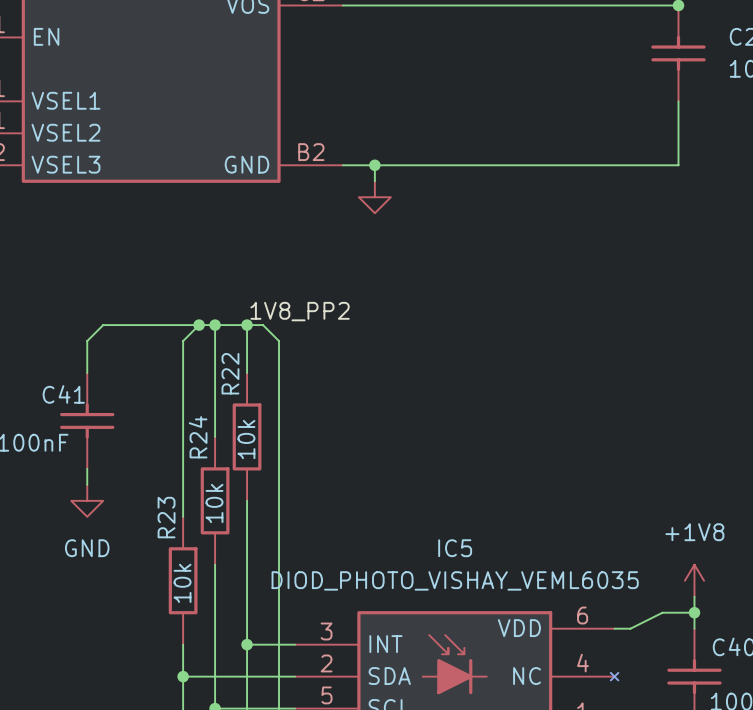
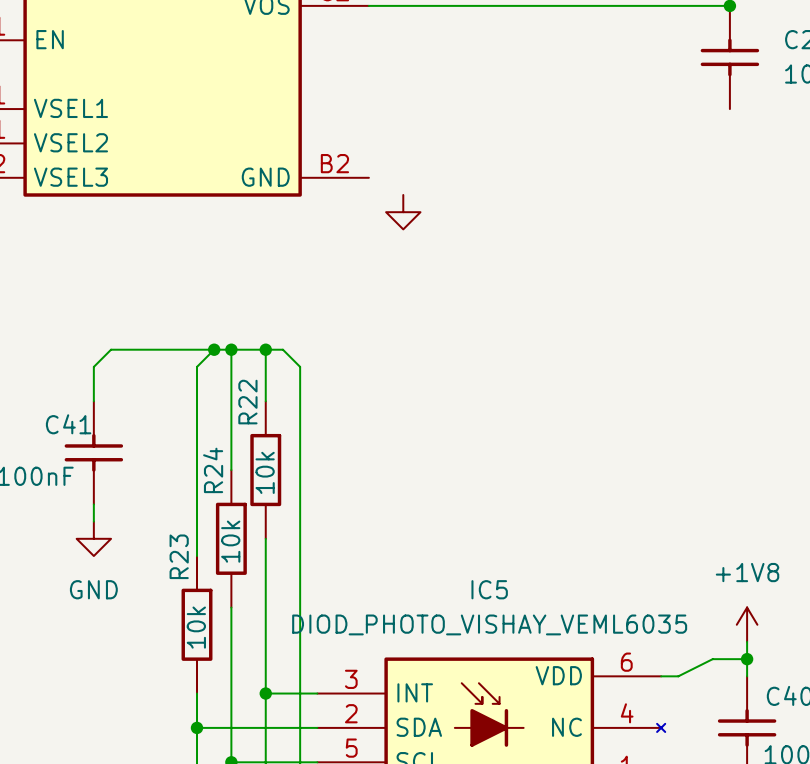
wire: (678, 101) (678, 165) (342, 165) -> none
wire: (374, 165) (374, 181) -> none
junction: (374, 165) -> none
label: 1V8_PP2 (300, 311) -> none

